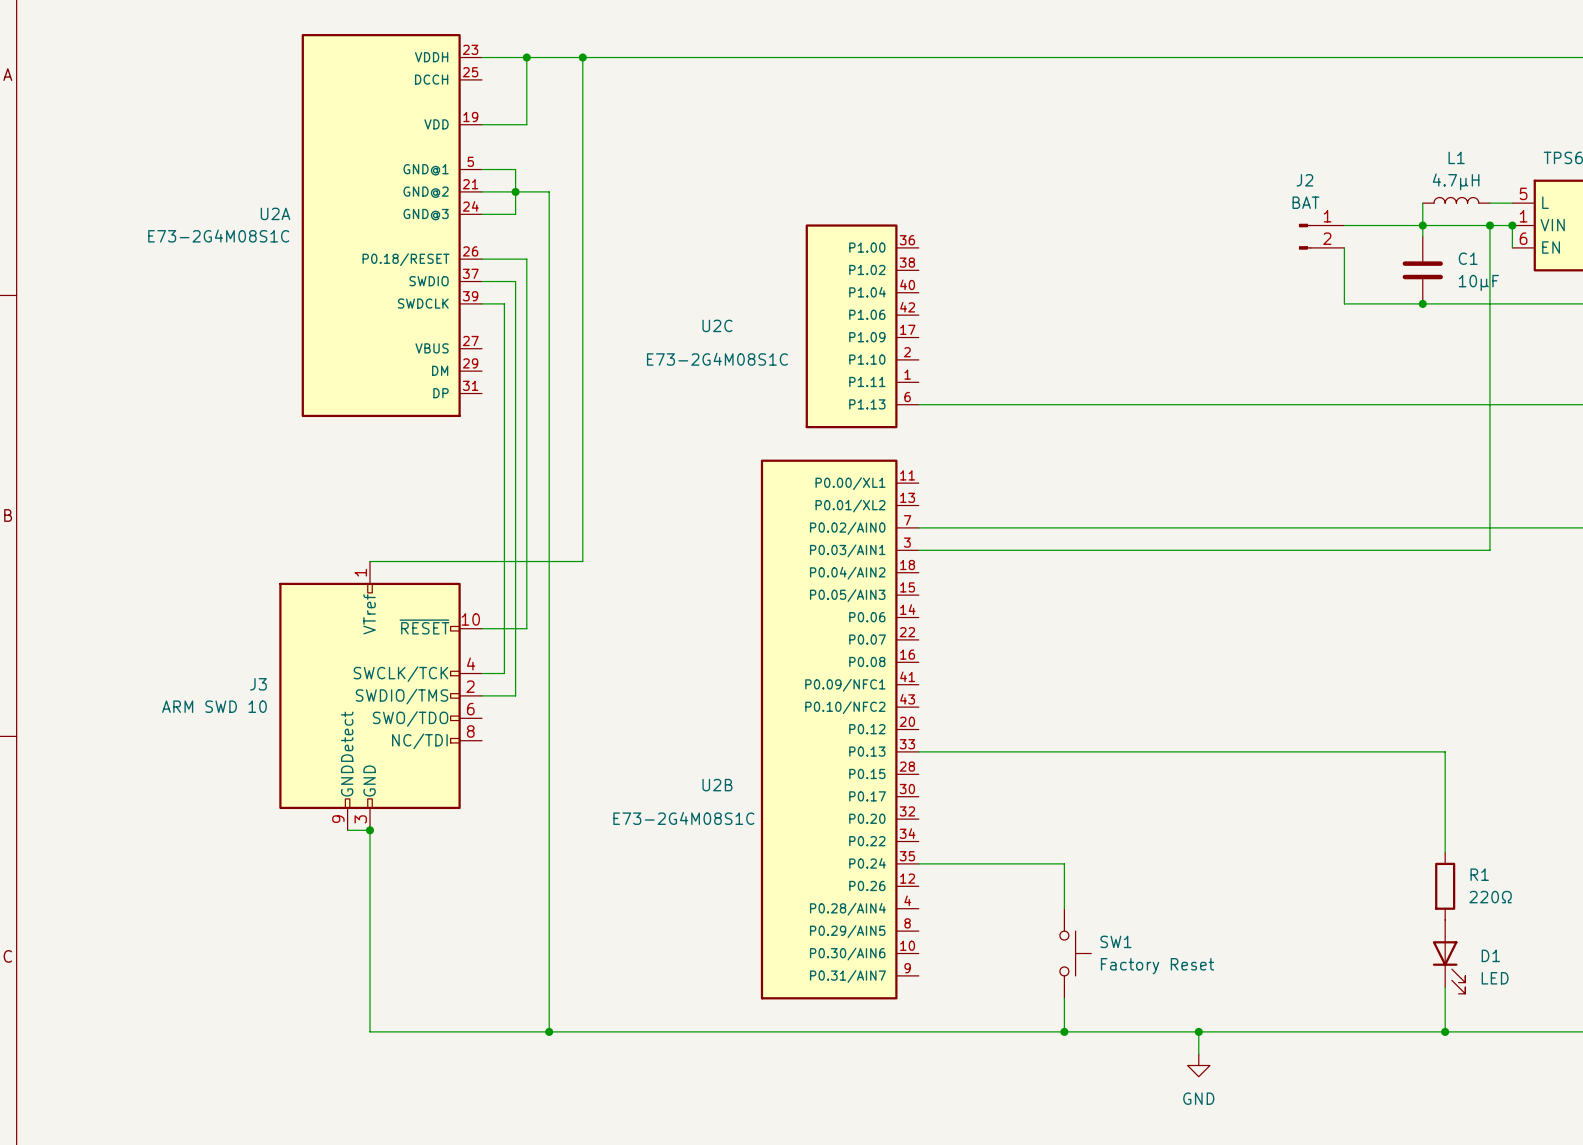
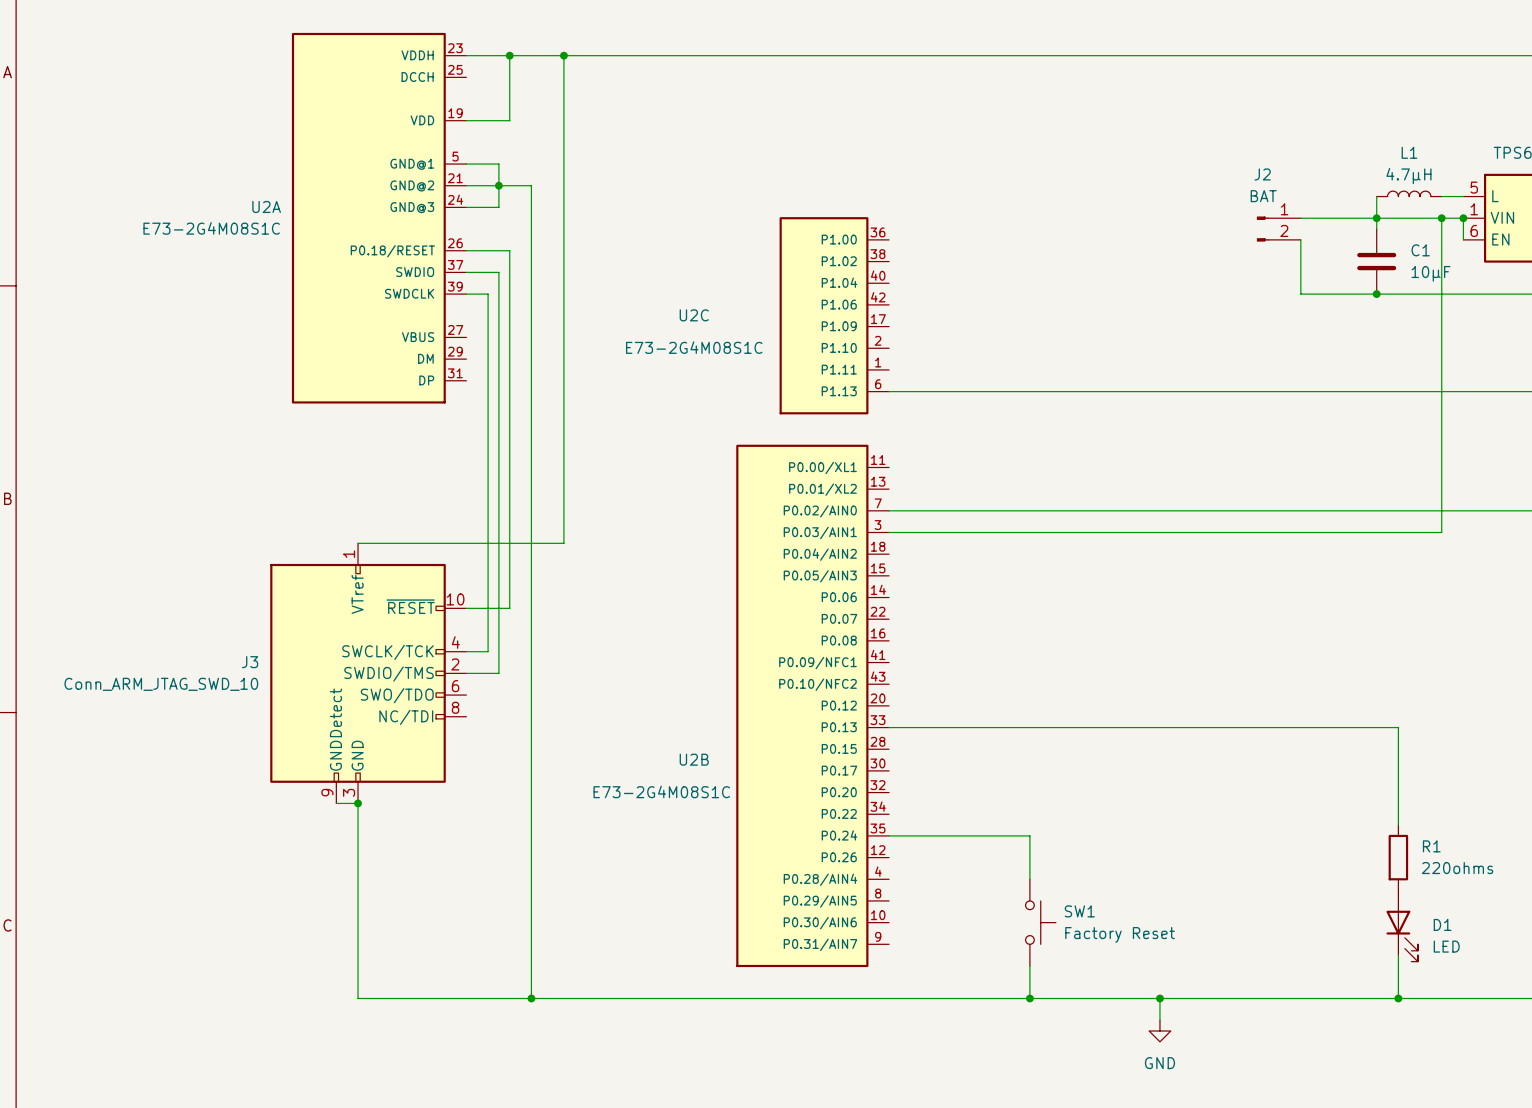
J3 value: ARM SWD 10 (214, 706) -> Conn_ARM_JTAG_SWD_10 (161, 684)
R1 value: 220Ω (1490, 897) -> 220ohms (1457, 868)

